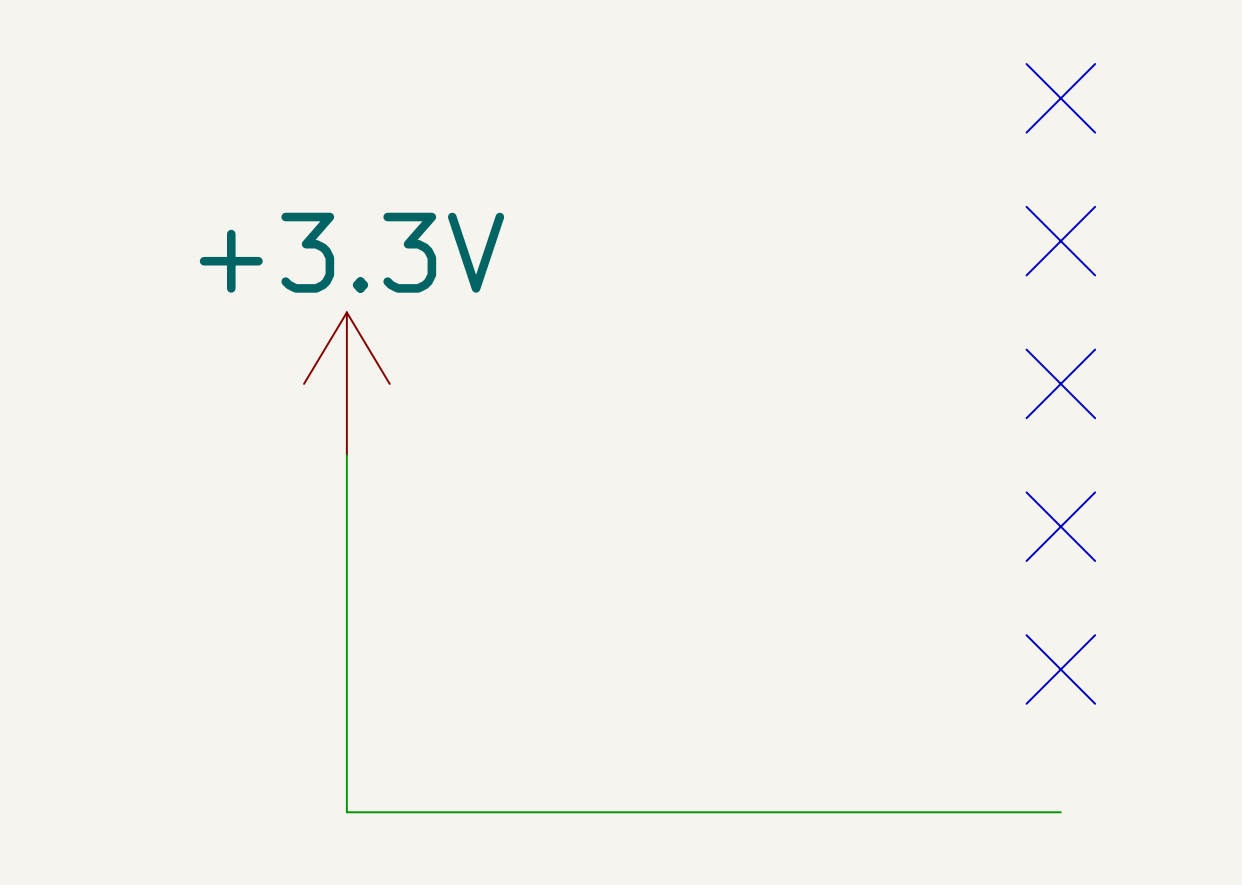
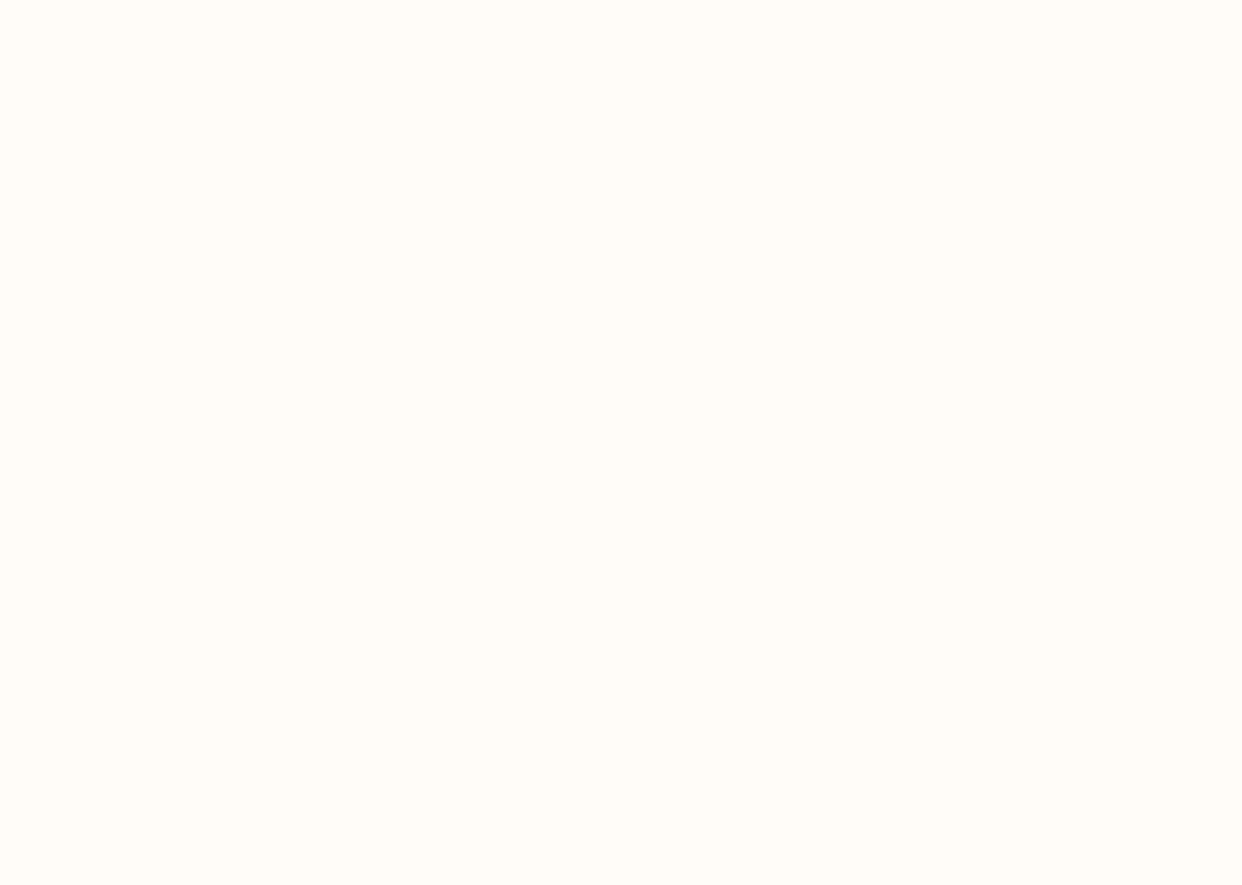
no-connect mark: (1060, 98) -> none
no-connect mark: (1060, 241) -> none
power symbol: +3.3V (346, 383) -> none
no-connect mark: (1060, 383) -> none
wire: (346, 455) (346, 812) (1060, 812) -> none
no-connect mark: (1060, 526) -> none
no-connect mark: (1060, 669) -> none

